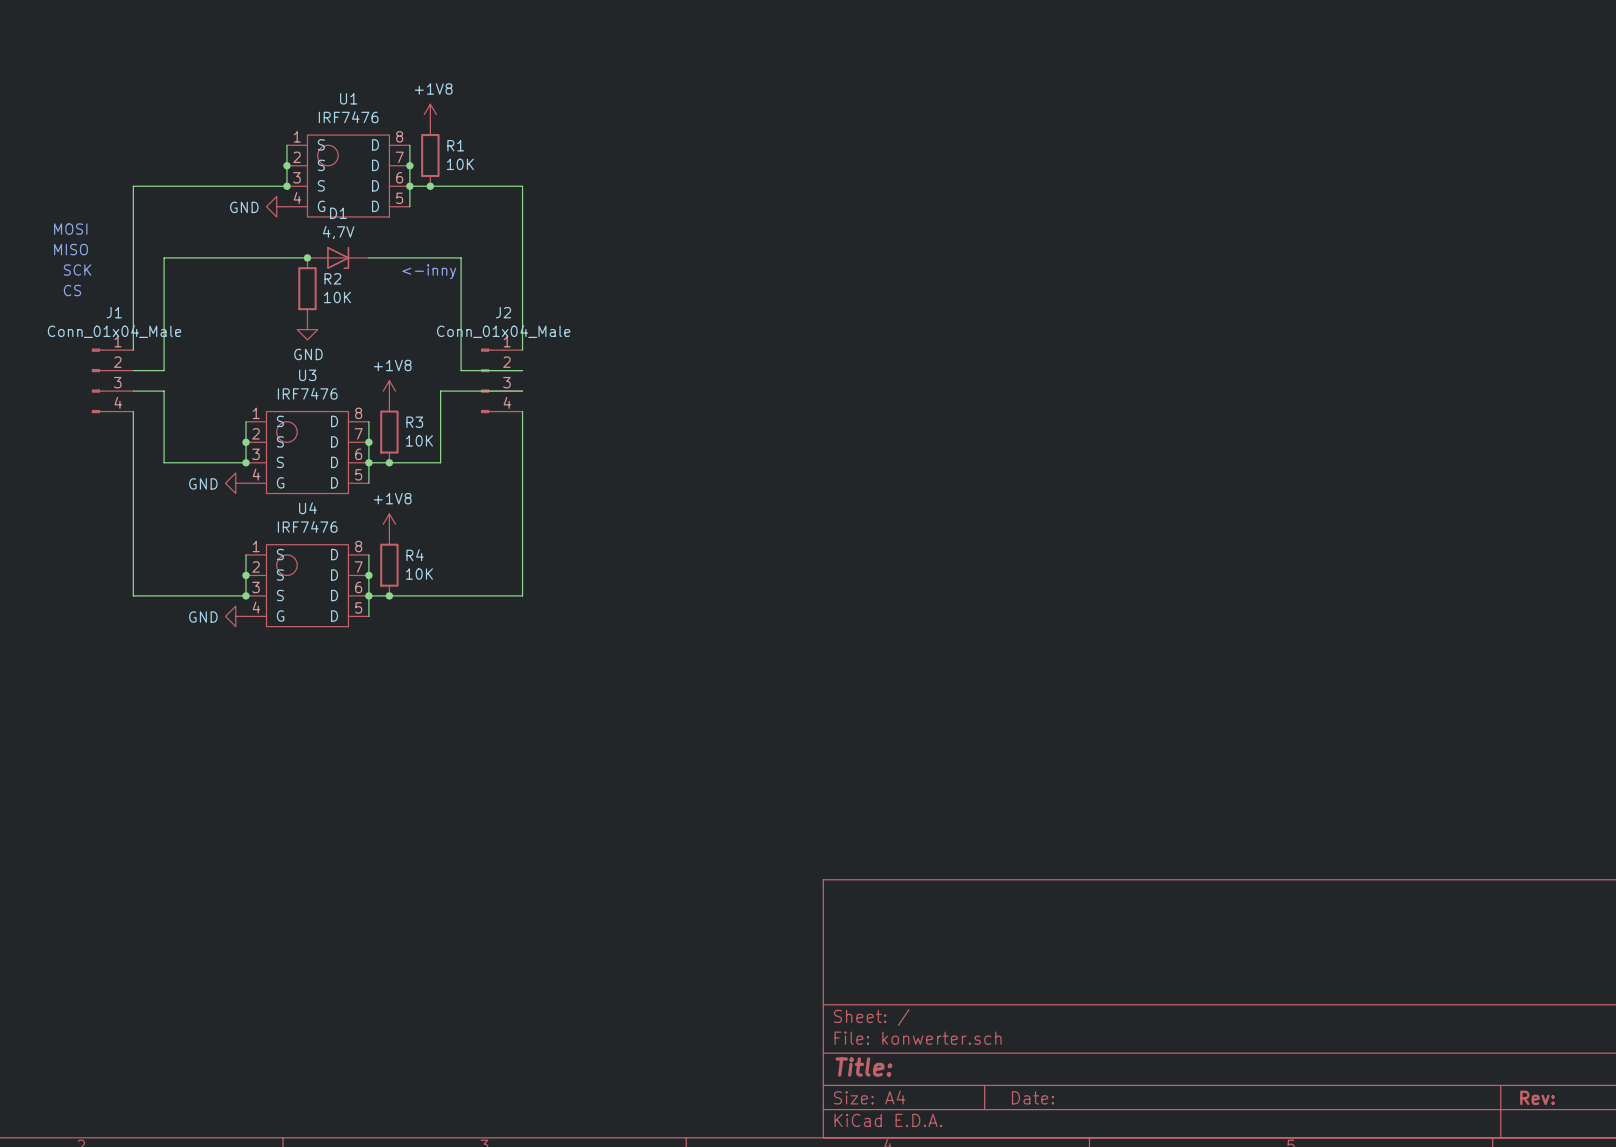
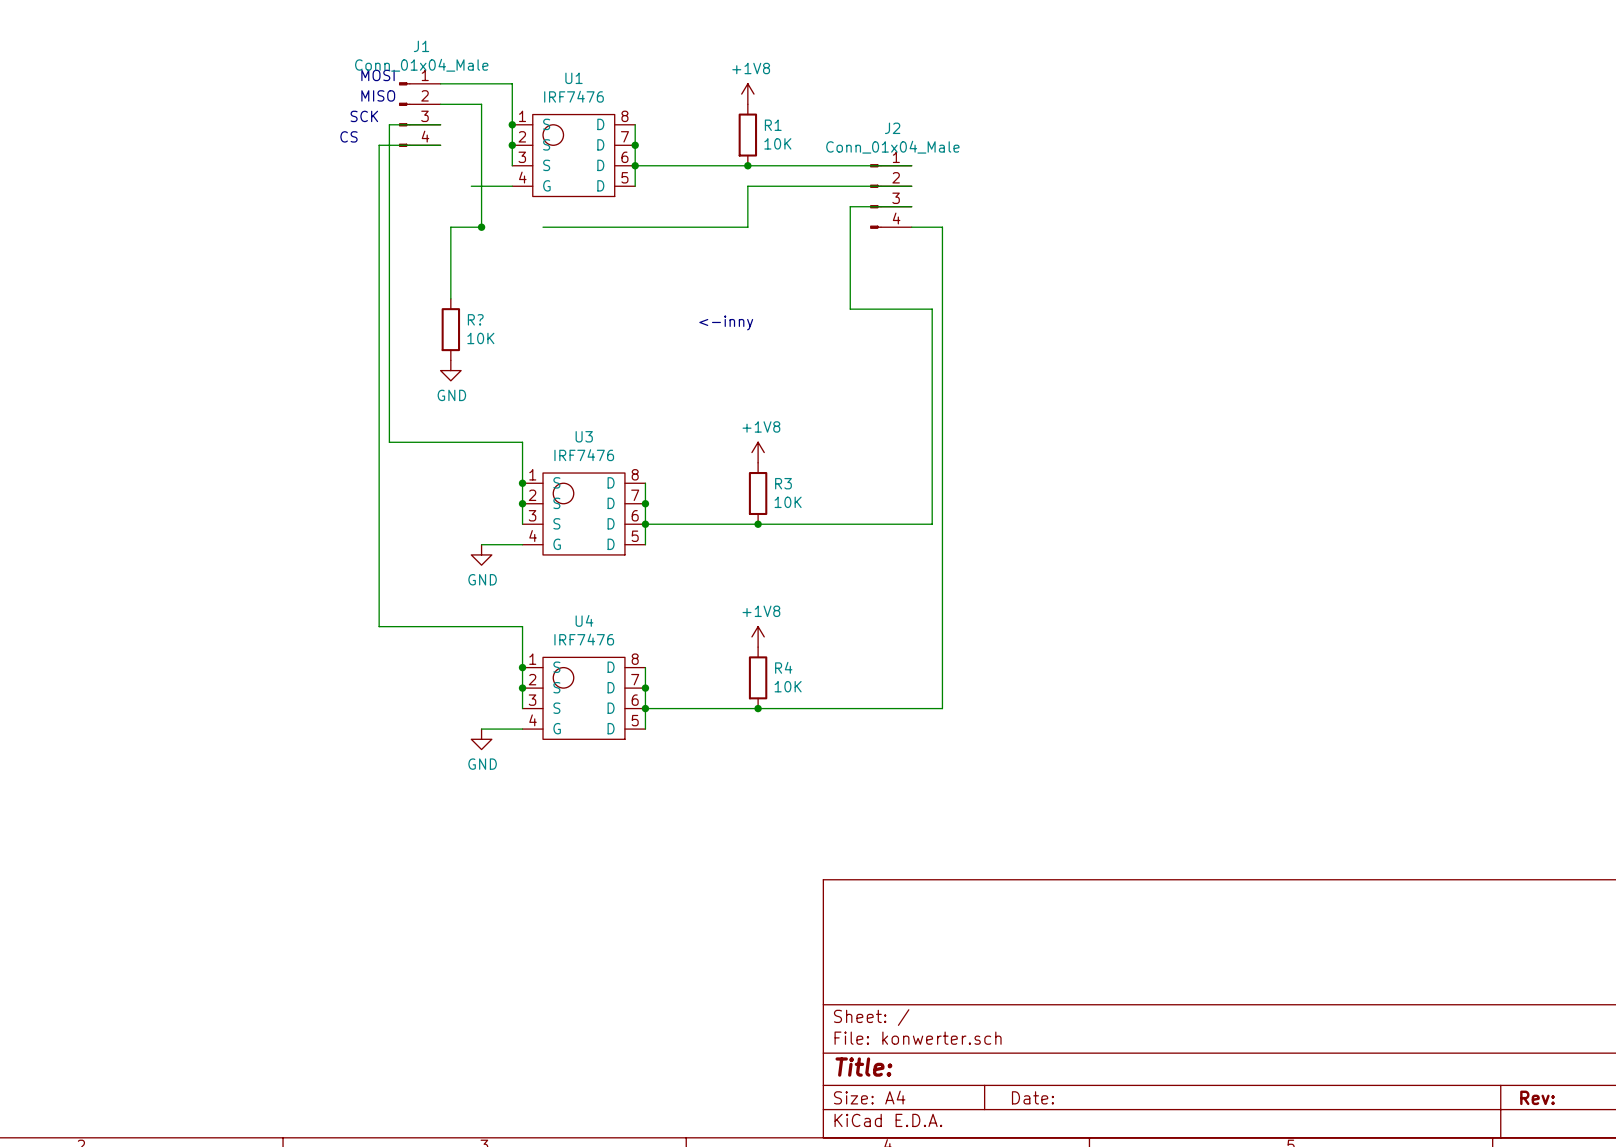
text: none -> MOSI (378, 75)
wire: none -> (440, 83) (512, 83) (512, 165)
power symbol: none -> +1V8 (747, 94)
text: none -> MISO (378, 95)
wire: none -> (440, 104) (481, 104) (481, 227) (450, 227) (450, 298)
power symbol: +1V8 (430, 114) -> none
text: none -> SCK (364, 116)
junction: none -> (512, 124)
wire: none -> (635, 124) (635, 186)
text: none -> CS (348, 136)
wire: (286, 145) (286, 186) (133, 186) (133, 350) -> none
wire: (409, 145) (409, 206) -> none
wire: none -> (440, 145) (379, 145) (379, 626) (522, 626) (522, 708)
junction: none -> (512, 145)
junction: none -> (635, 145)
R1 position: (430, 155) -> (747, 135)
junction: (286, 165) -> none
junction: (409, 165) -> none
wire: none -> (635, 165) (911, 165)
junction: none -> (635, 165)
junction: none -> (747, 165)
U1 position: (348, 176) -> (573, 155)
junction: (286, 186) -> none
wire: (409, 186) (471, 186) -> none
junction: (409, 186) -> none
junction: (430, 186) -> none
wire: (512, 186) (522, 186) (522, 350) -> none
wire: none -> (911, 186) (747, 186) (747, 227) (543, 227)
power symbol: GND (276, 206) -> none
wire: none -> (911, 206) (850, 206) (850, 309) (932, 309) (932, 524) (645, 524)
junction: none -> (481, 227)
wire: none -> (911, 227) (942, 227) (942, 708) (645, 708)
text: MOSI (70, 229) -> none
text: MISO (71, 249) -> none
wire: (307, 257) (164, 257) (164, 370) (133, 370) -> none
junction: (307, 257) -> none
D1: 4,7V (338, 257) -> none
wire: (368, 257) (461, 257) (461, 370) (522, 370) -> none
text: SCK (77, 270) -> none
text: <-inny (429, 271) -> none
R2: 10K (307, 288) -> none
text: CS (72, 290) -> none
text: none -> <-inny (726, 322)
power symbol: GND (307, 329) -> none
R?: none -> 10K (450, 329)
power symbol: none -> GND (450, 370)
J1 position: (112, 380) -> (419, 114)
J2 position: (501, 380) -> (890, 196)
wire: (133, 391) (164, 391) (164, 462) (246, 462) (246, 421) -> none
power symbol: +1V8 (389, 391) -> none
wire: (522, 391) (440, 391) (440, 462) (368, 462) -> none
wire: (133, 411) (133, 595) (246, 595) (246, 554) -> none
wire: (522, 411) (522, 442) -> (440, 124) (389, 124) (389, 442) (522, 442)
wire: (368, 421) (368, 483) -> none
R3 position: (389, 432) -> (758, 493)
junction: (246, 442) -> none
junction: (368, 442) -> none
U3 position: (307, 452) -> (583, 513)
power symbol: none -> +1V8 (758, 452)
junction: (246, 462) -> none
junction: (368, 462) -> none
junction: (389, 462) -> none
power symbol: GND (235, 483) -> none
junction: none -> (522, 483)
wire: none -> (645, 483) (645, 544)
junction: none -> (522, 503)
junction: none -> (645, 503)
power symbol: +1V8 (389, 524) -> none
wire: (522, 524) (522, 595) (368, 595) -> none
junction: none -> (645, 524)
junction: none -> (758, 524)
wire: none -> (481, 544) (522, 544)
wire: (368, 554) (368, 616) -> none
power symbol: none -> GND (481, 554)
R4 position: (389, 565) -> (758, 677)
junction: (246, 575) -> none
junction: (368, 575) -> none
U4 position: (307, 585) -> (583, 698)
junction: (246, 595) -> none
junction: (368, 595) -> none
junction: (389, 595) -> none
power symbol: GND (235, 616) -> none
power symbol: none -> +1V8 (758, 636)
junction: none -> (522, 667)
wire: none -> (645, 667) (645, 729)
junction: none -> (522, 688)
junction: none -> (645, 688)
junction: none -> (645, 708)
junction: none -> (758, 708)
wire: none -> (481, 729) (522, 729)
power symbol: none -> GND (481, 739)

